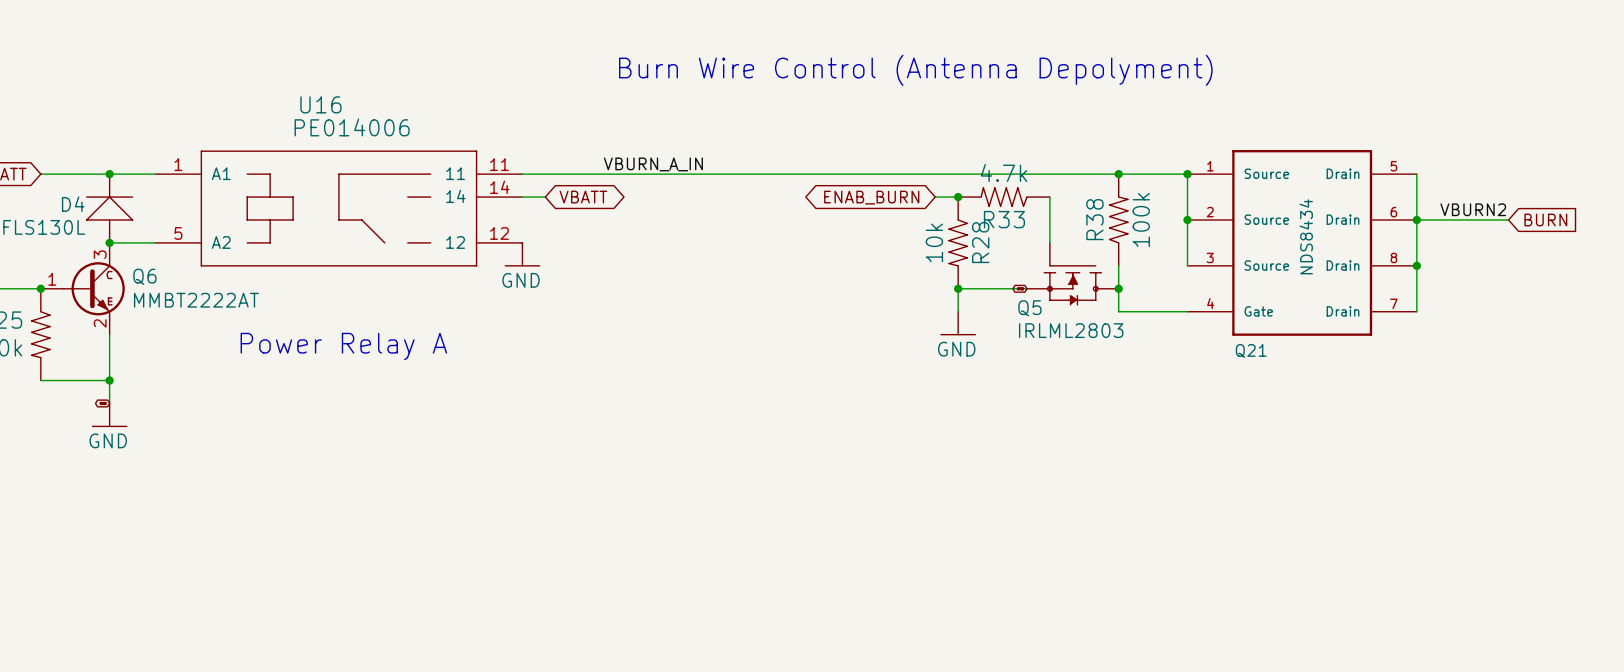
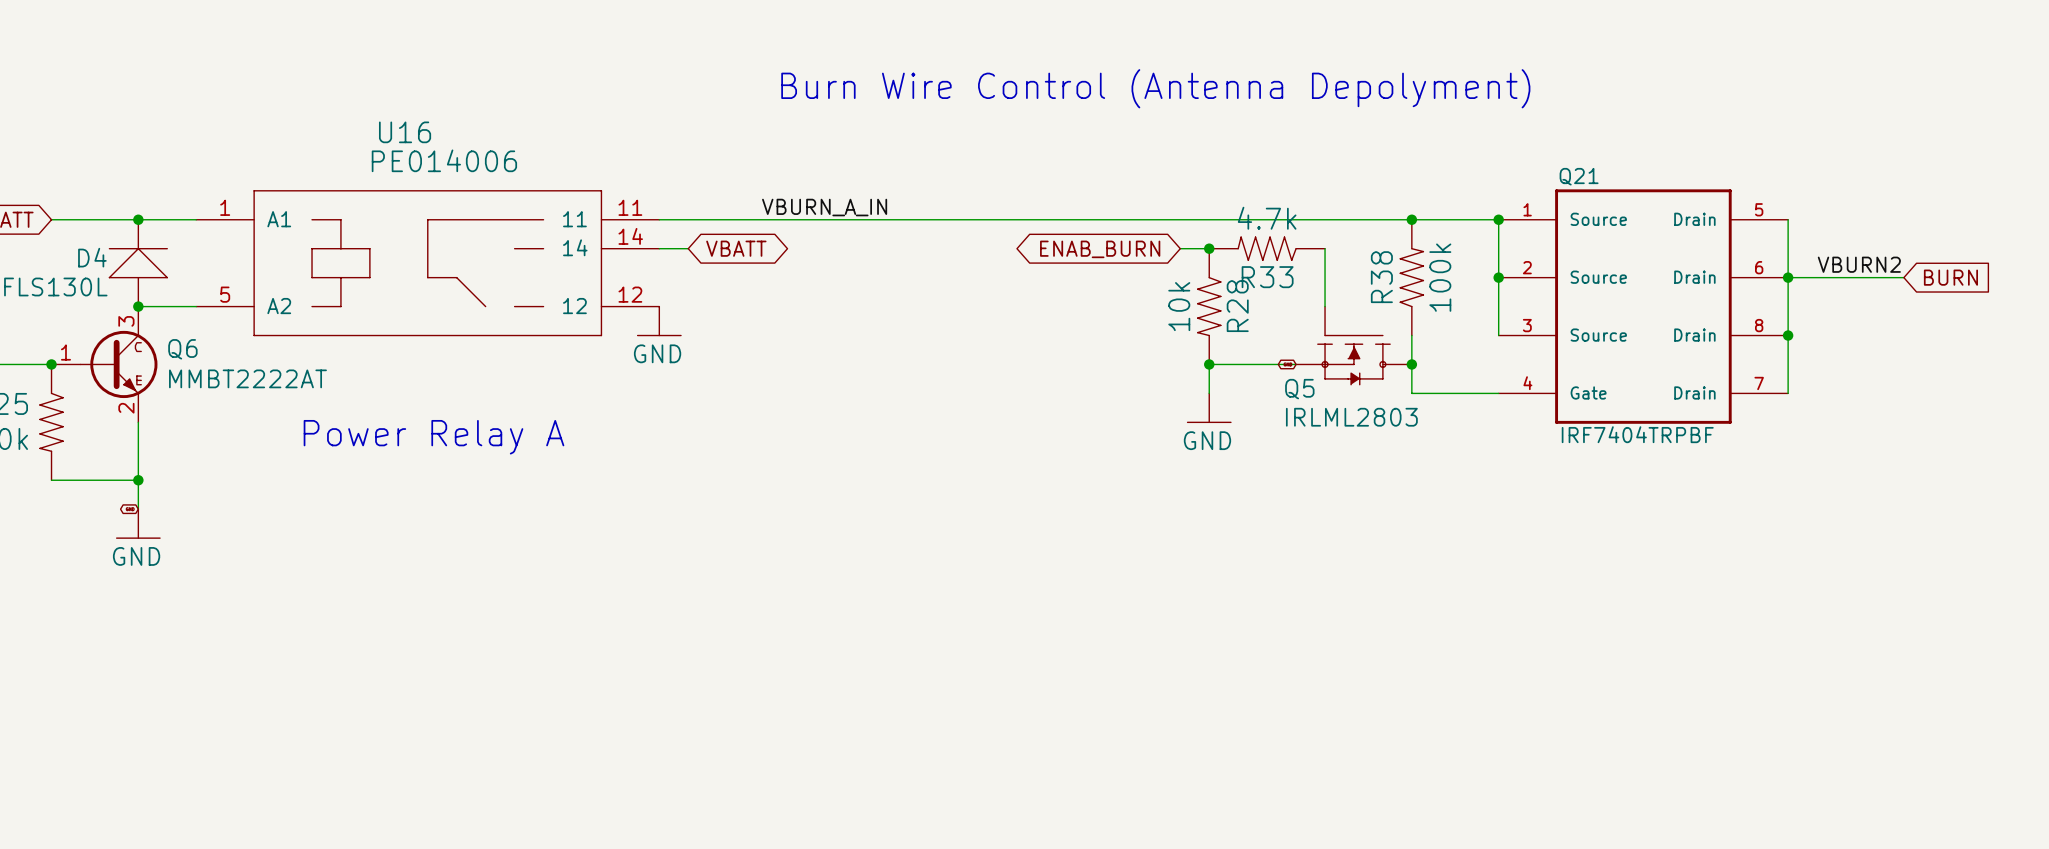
Q21 value: NDS8434 (1306, 236) -> IRF7404TRPBF (1637, 434)
Q21 name position: Q21 (1251, 351) -> Q21 (1579, 176)

